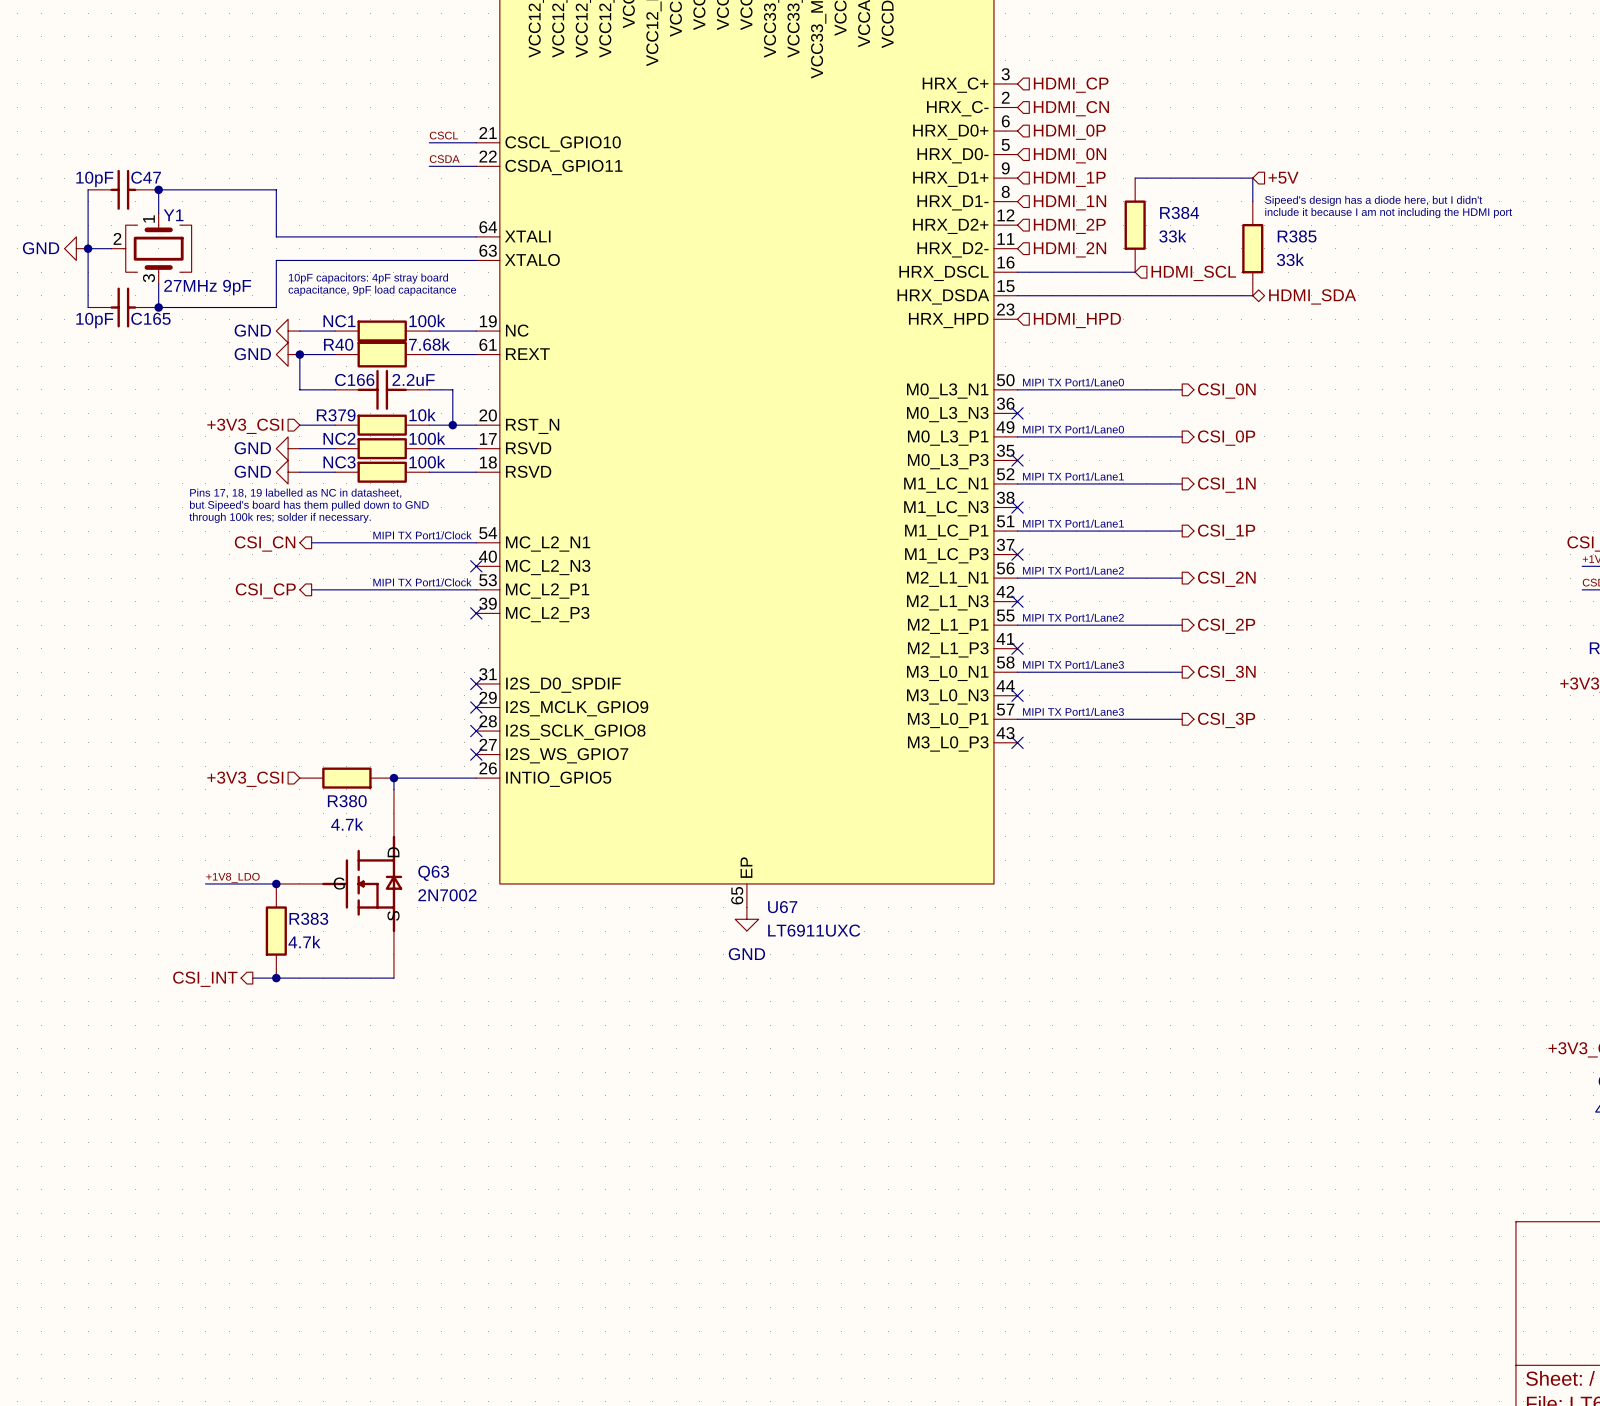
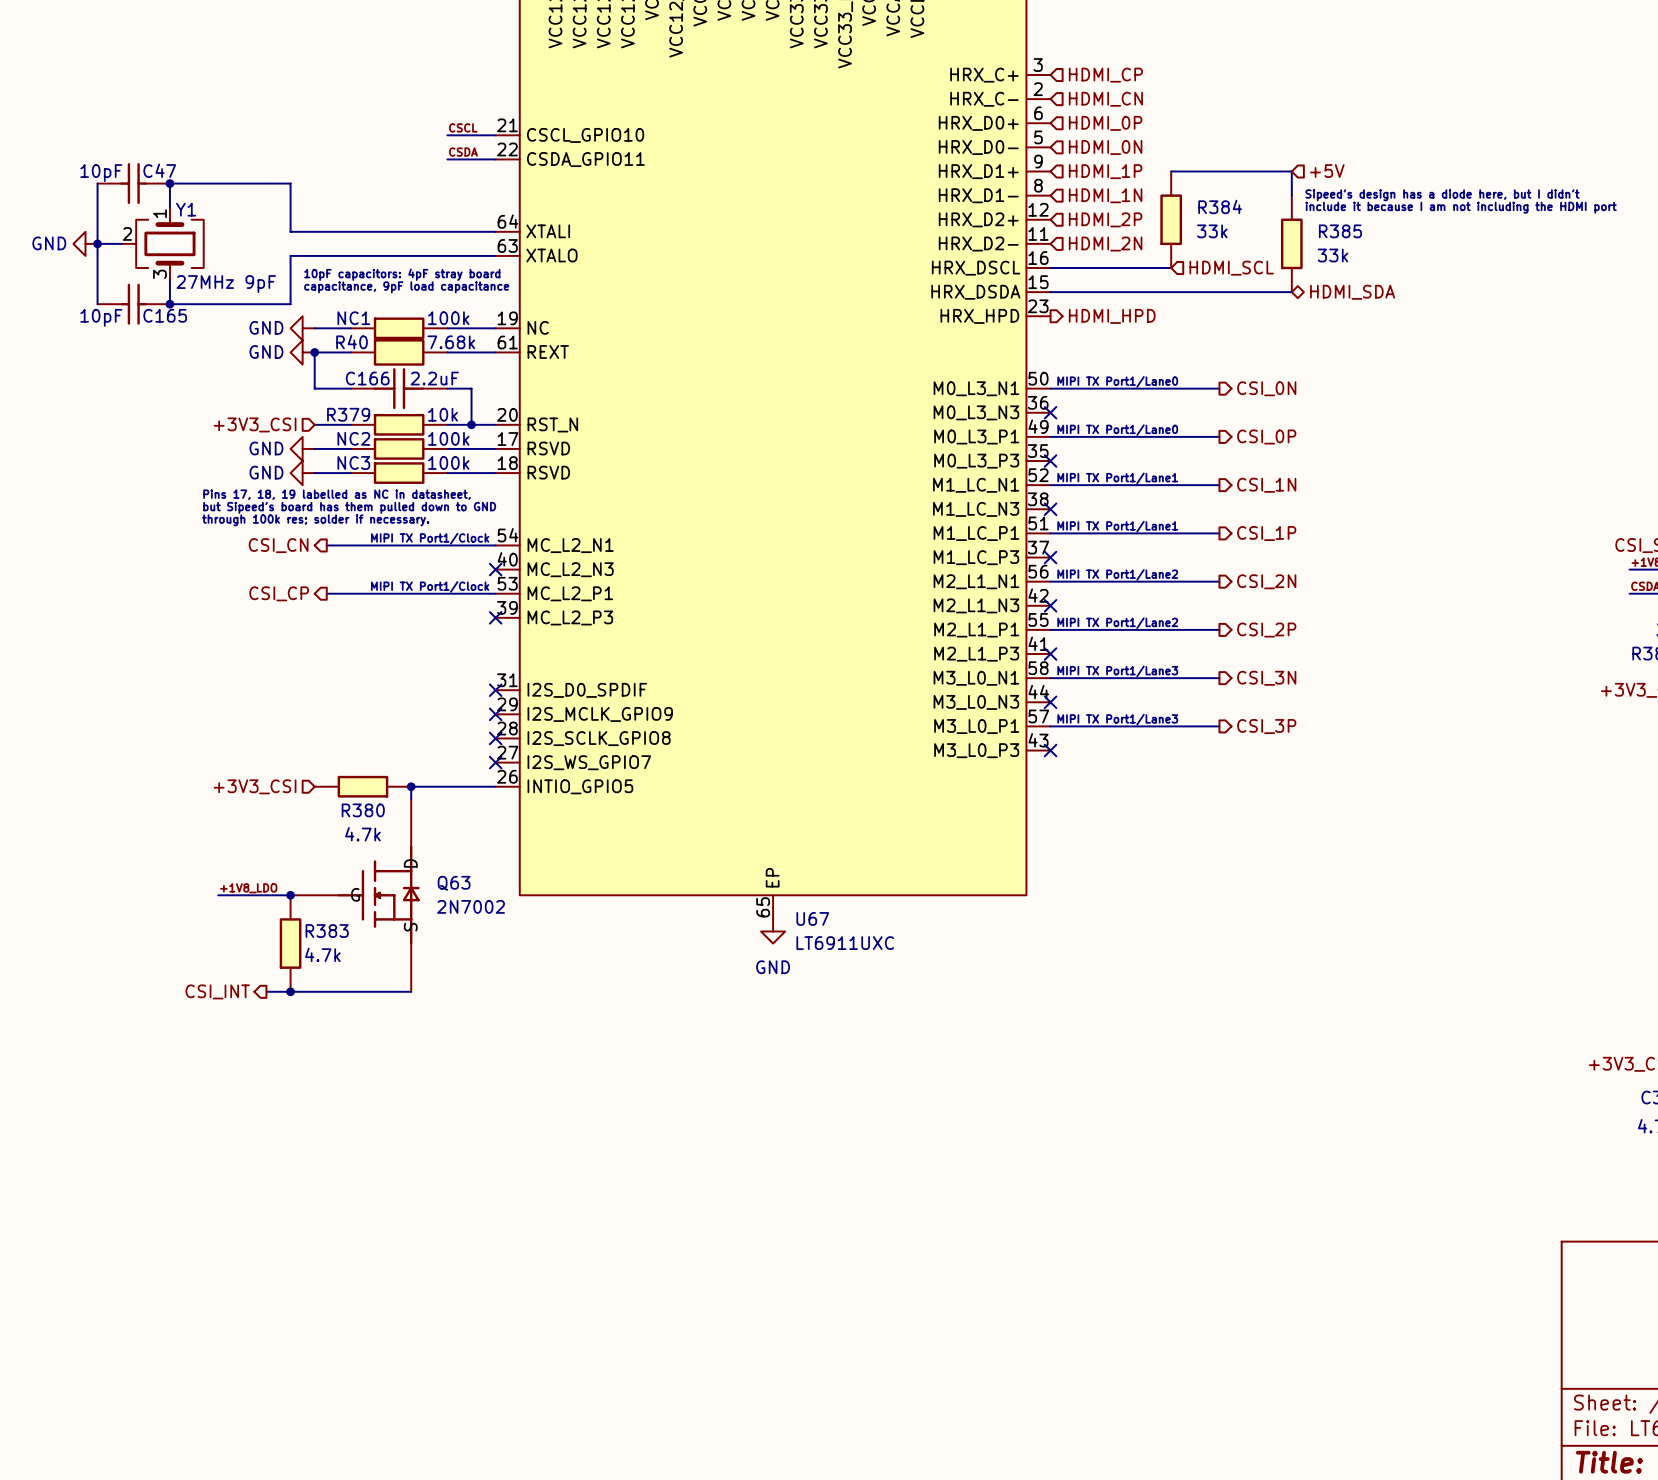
hierarchical label shape: input (1077, 320) -> output (1112, 316)

